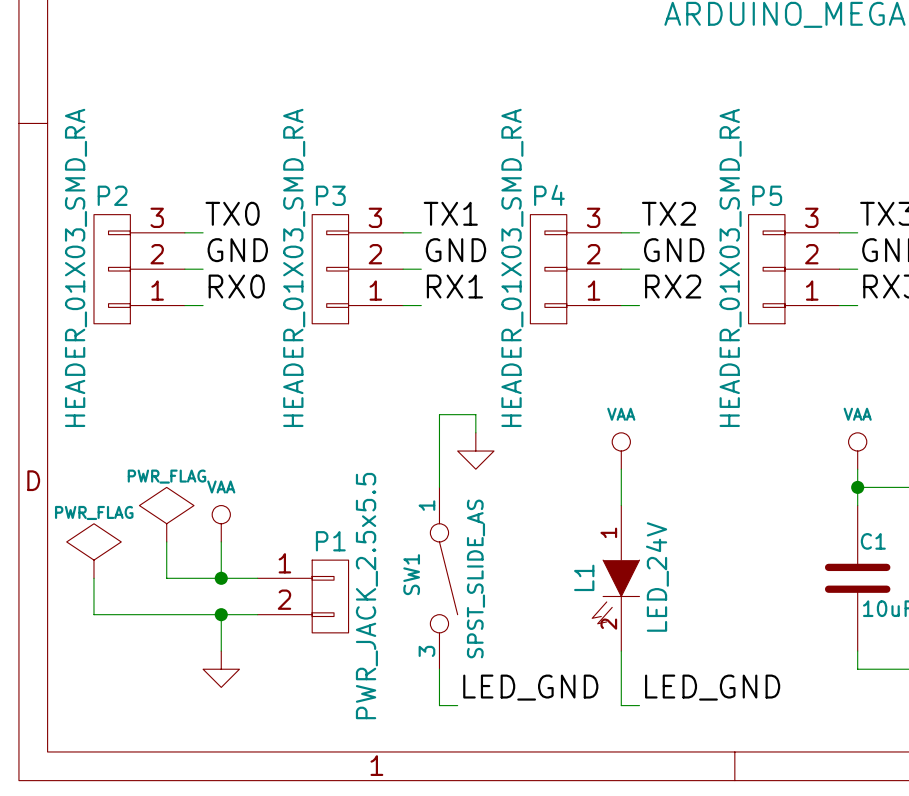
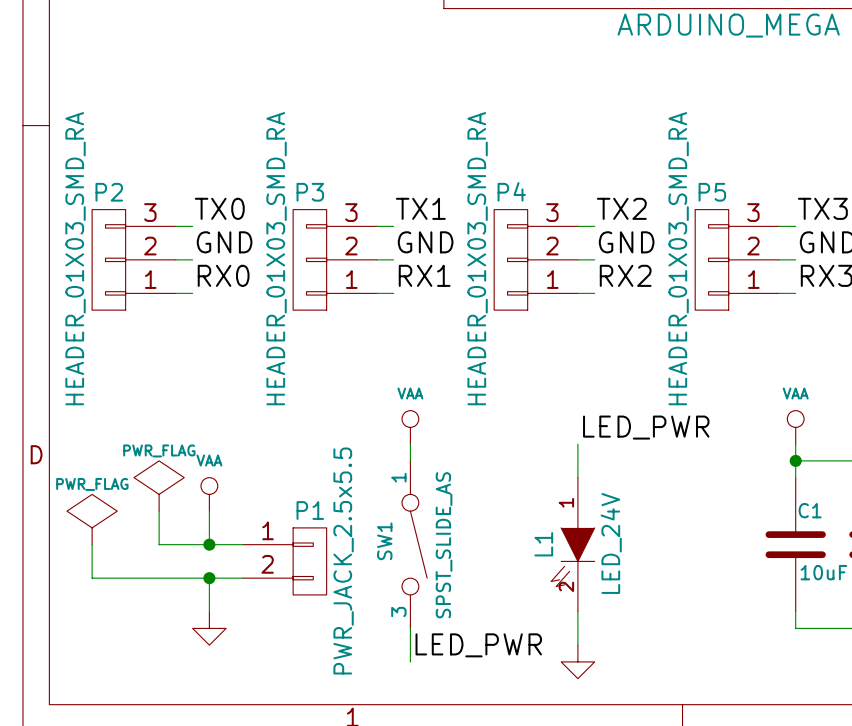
wire: (475, 432) (475, 414) (439, 414) (439, 469) -> none
power symbol position: (475, 451) -> (577, 661)
power symbol position: VAA (621, 451) -> VAA (410, 427)
label: none -> LED_PWR (646, 427)
label: none -> LED_PWR (478, 645)
label: LED_GND (530, 687) -> none
label: LED_GND (712, 687) -> none
wire: (439, 705) (457, 705) -> none

